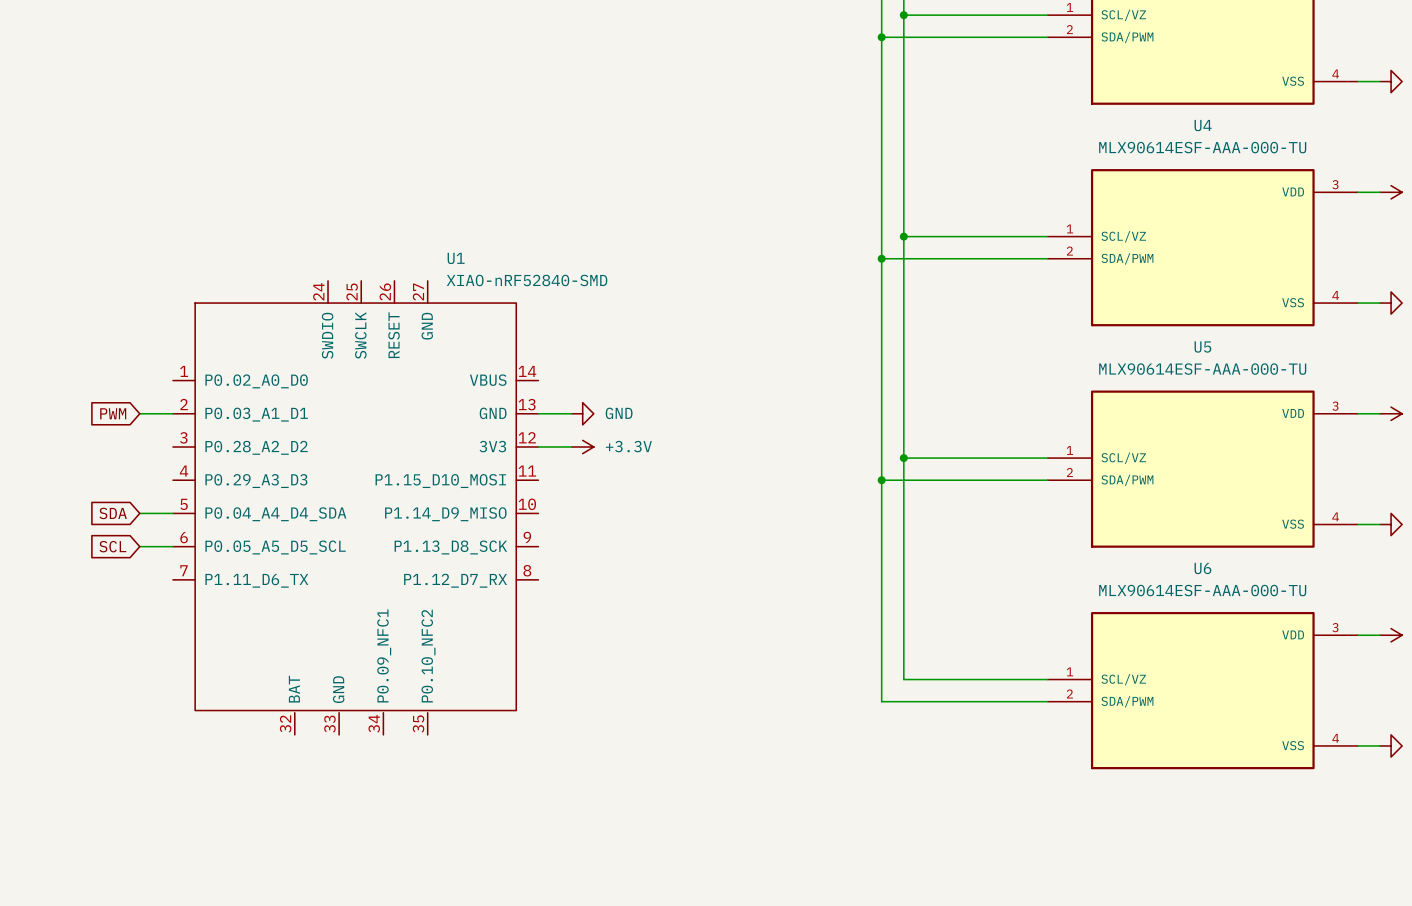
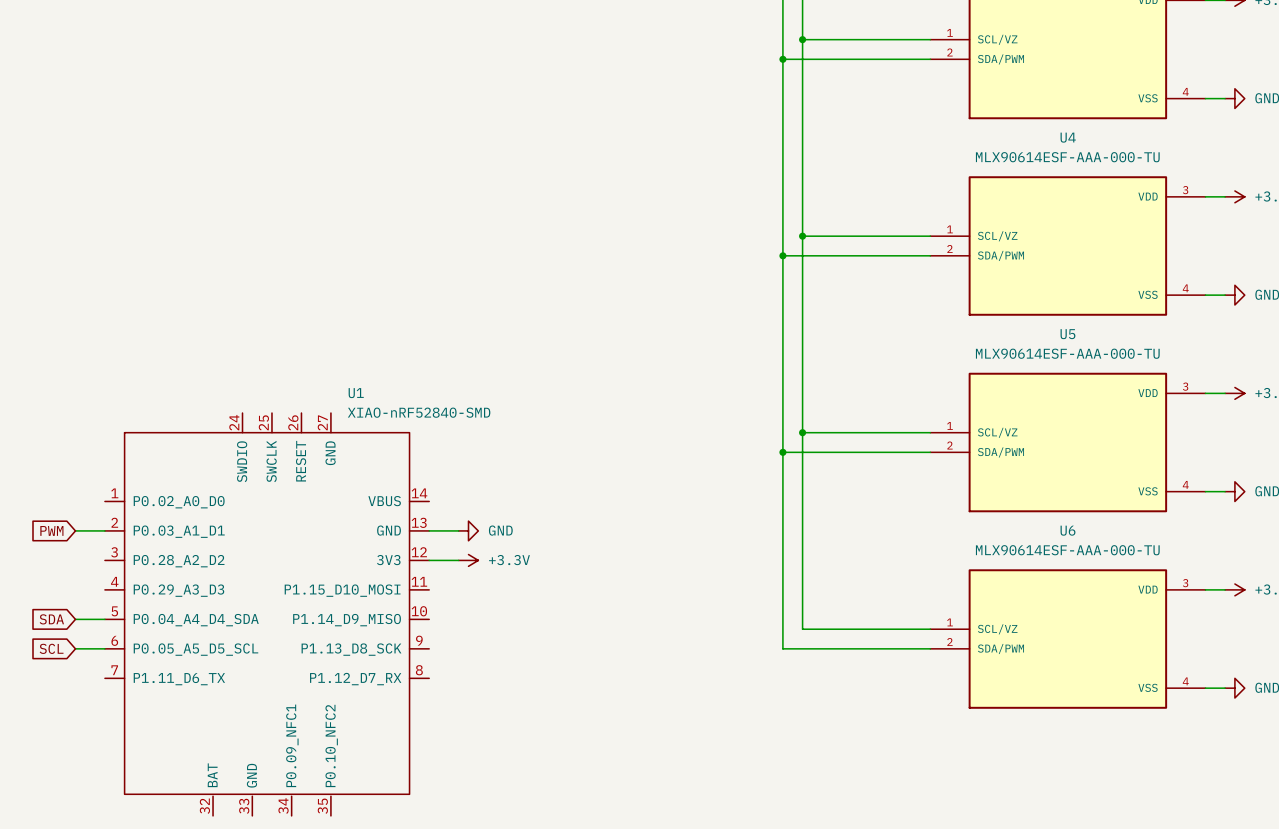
global label position: PWM (113, 413) -> PWM (51, 530)
wire: (139, 413) (172, 413) -> (75, 530) (104, 530)
wire: (538, 413) (571, 413) -> (429, 530) (458, 530)
power symbol position: GND (582, 413) -> GND (468, 530)
wire: (538, 446) (571, 446) -> (429, 560) (458, 560)
power symbol position: +3.3V (582, 446) -> +3.3V (468, 560)
U1 position: (355, 507) -> (267, 614)
global label position: SDA (113, 513) -> SDA (51, 619)
wire: (139, 513) (172, 513) -> (75, 619) (104, 619)
global label position: SCL (112, 546) -> SCL (51, 648)
wire: (139, 546) (172, 546) -> (75, 648) (104, 648)

